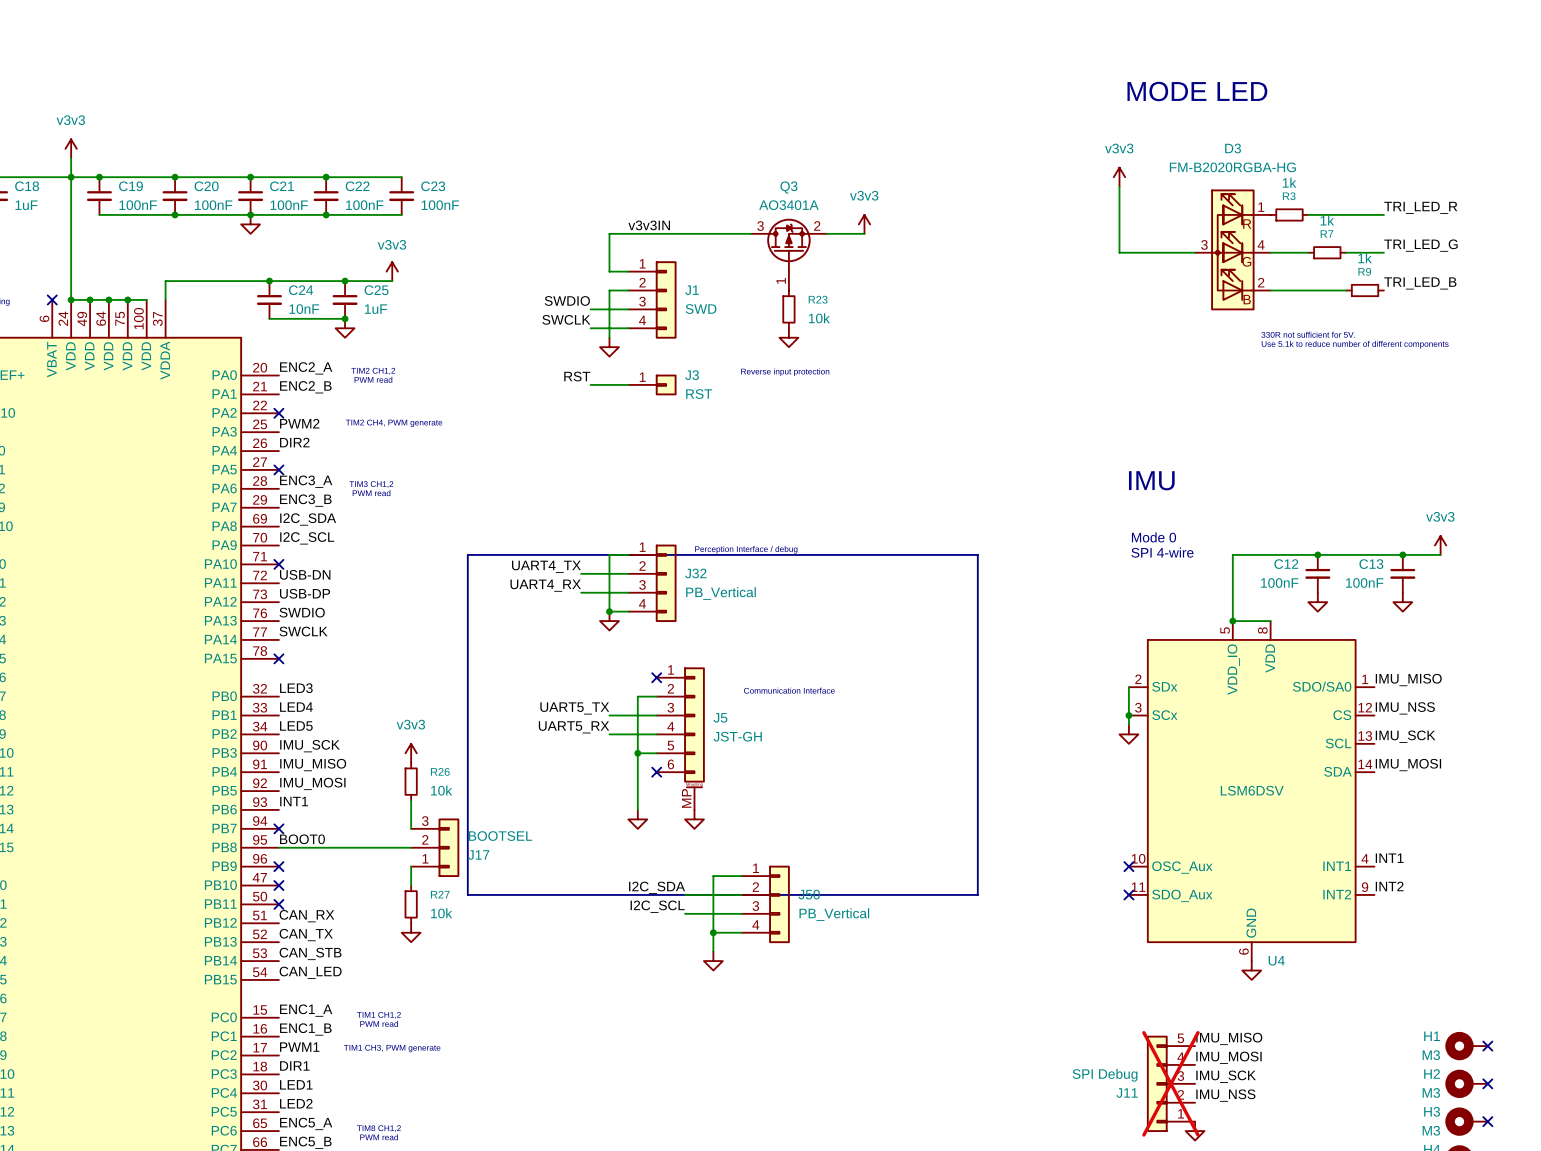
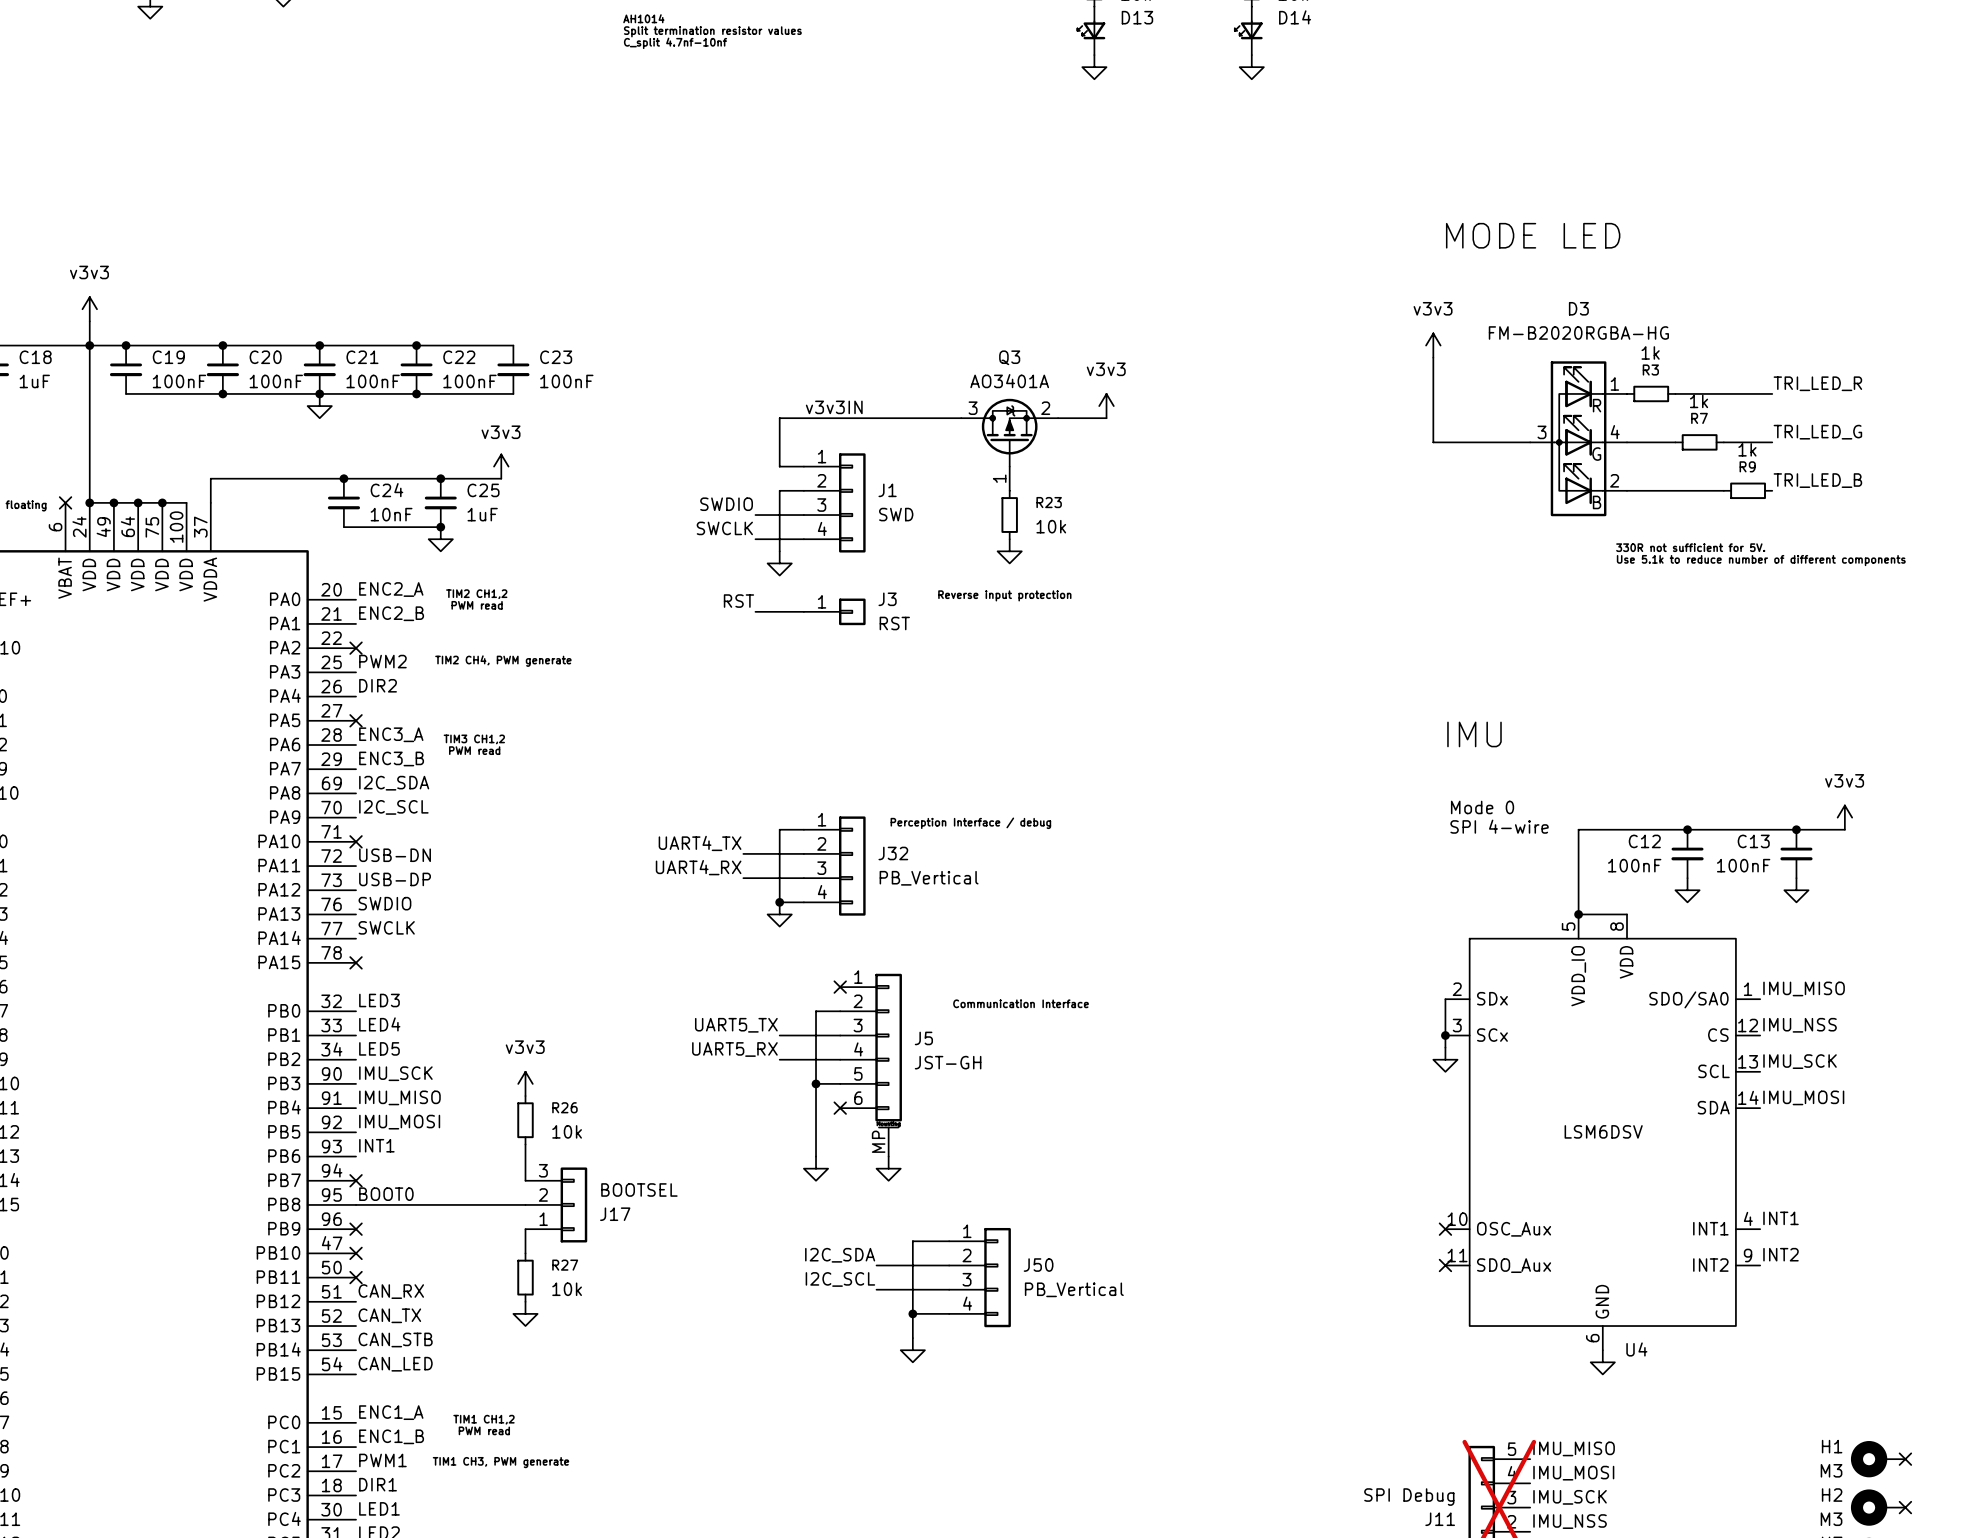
line: (467, 554) (977, 554) (977, 894) (467, 894) (467, 554) -> none

